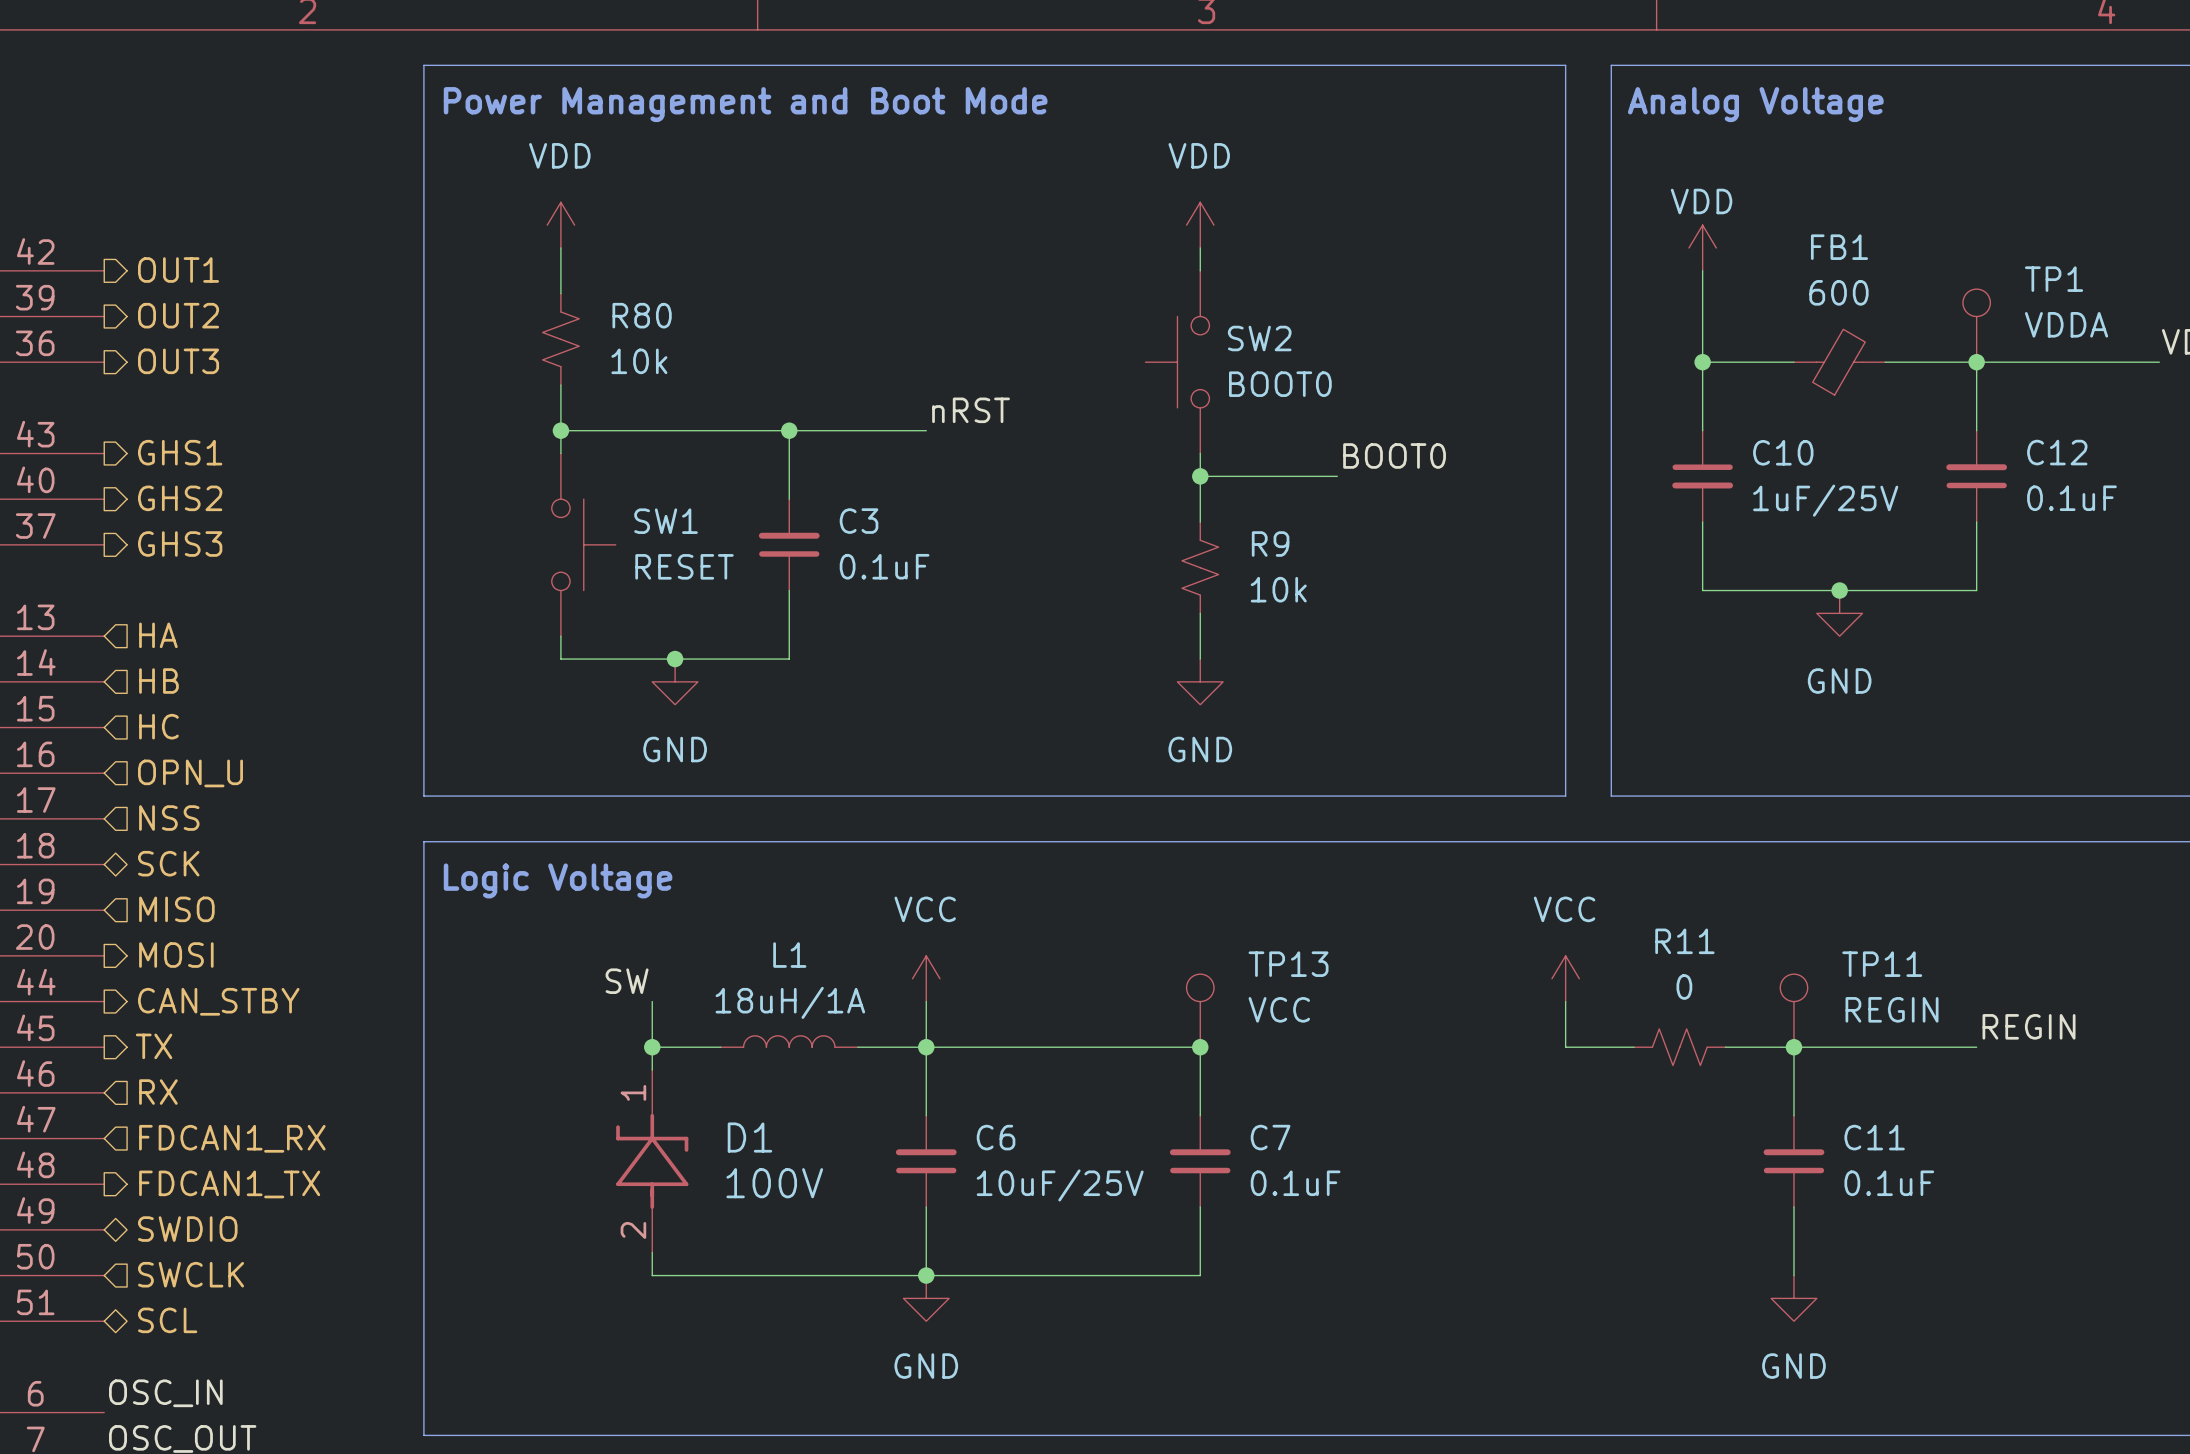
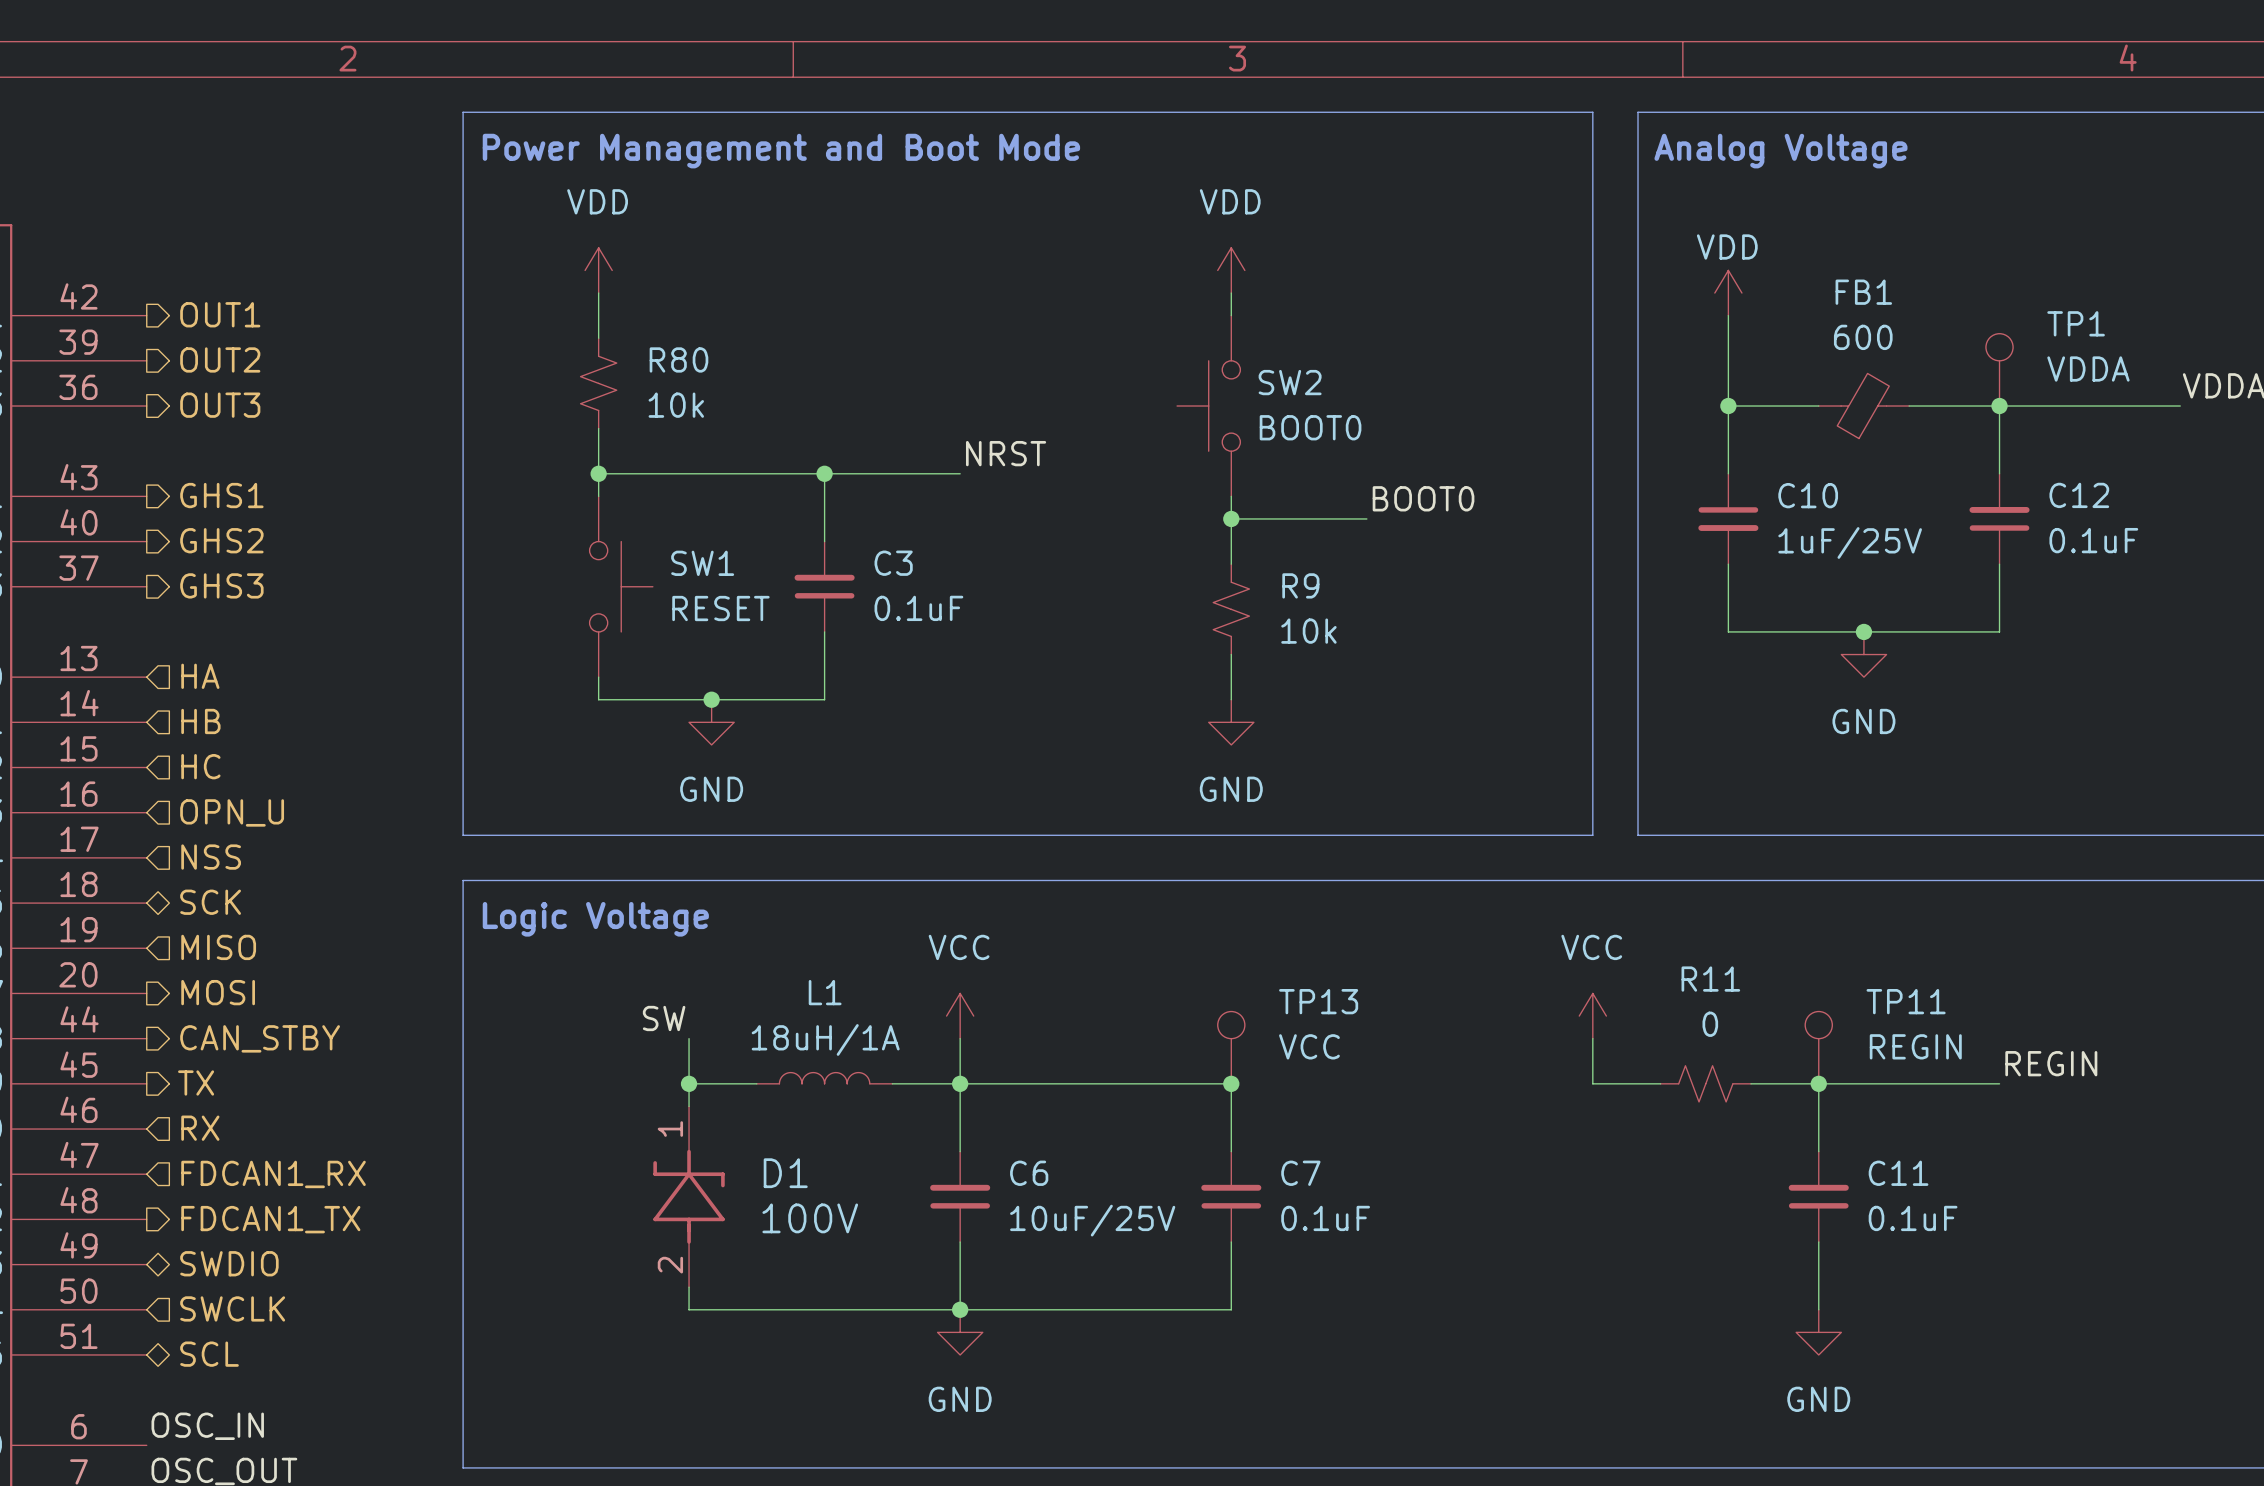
label: nRST (971, 410) -> NRST (1006, 453)

